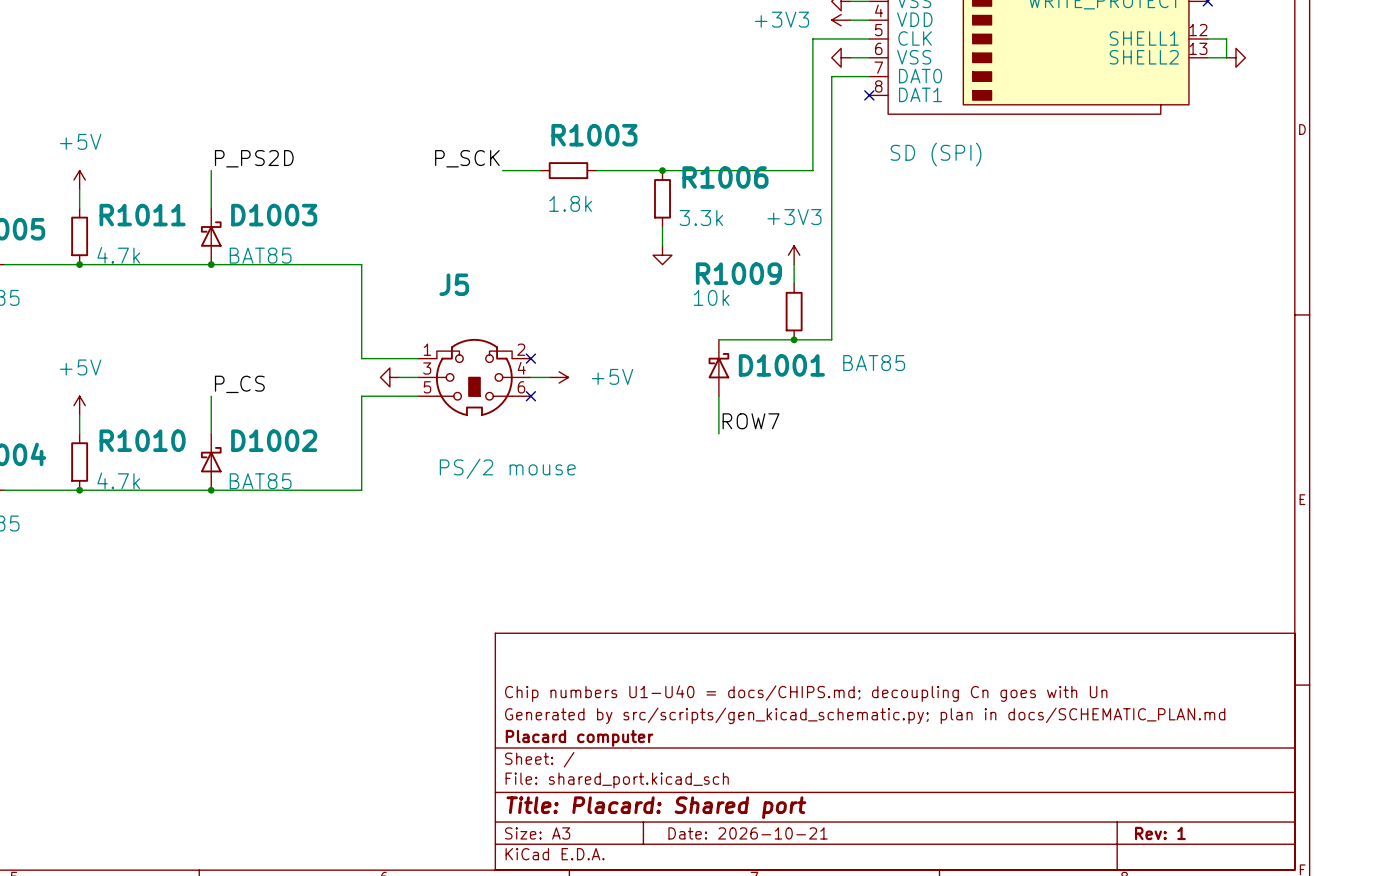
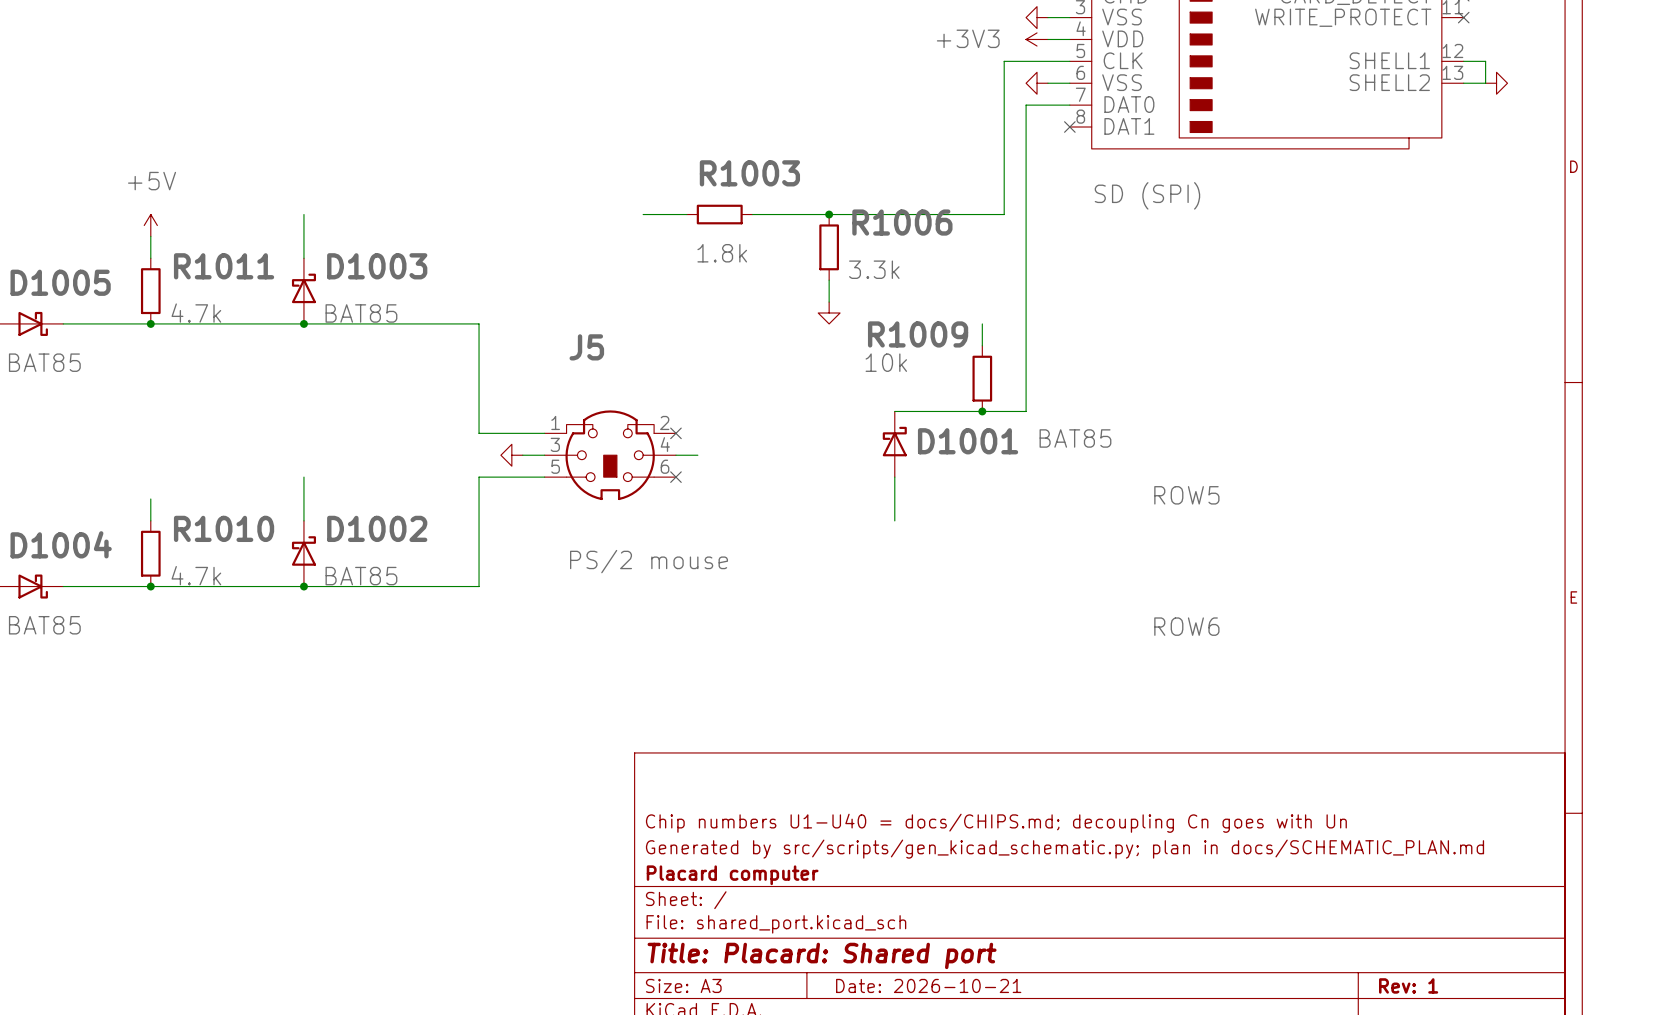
label: P_PS2D (254, 158) -> none
label: P_SCK (467, 158) -> none
power symbol: +3V3 (794, 255) -> none
power symbol: +5V (559, 377) -> none
label: P_CS (239, 384) -> none
power symbol: +5V (79, 405) -> none
label: none -> ROW5 (1186, 495)
label: ROW7 (751, 421) -> none
label: none -> ROW6 (1186, 626)

